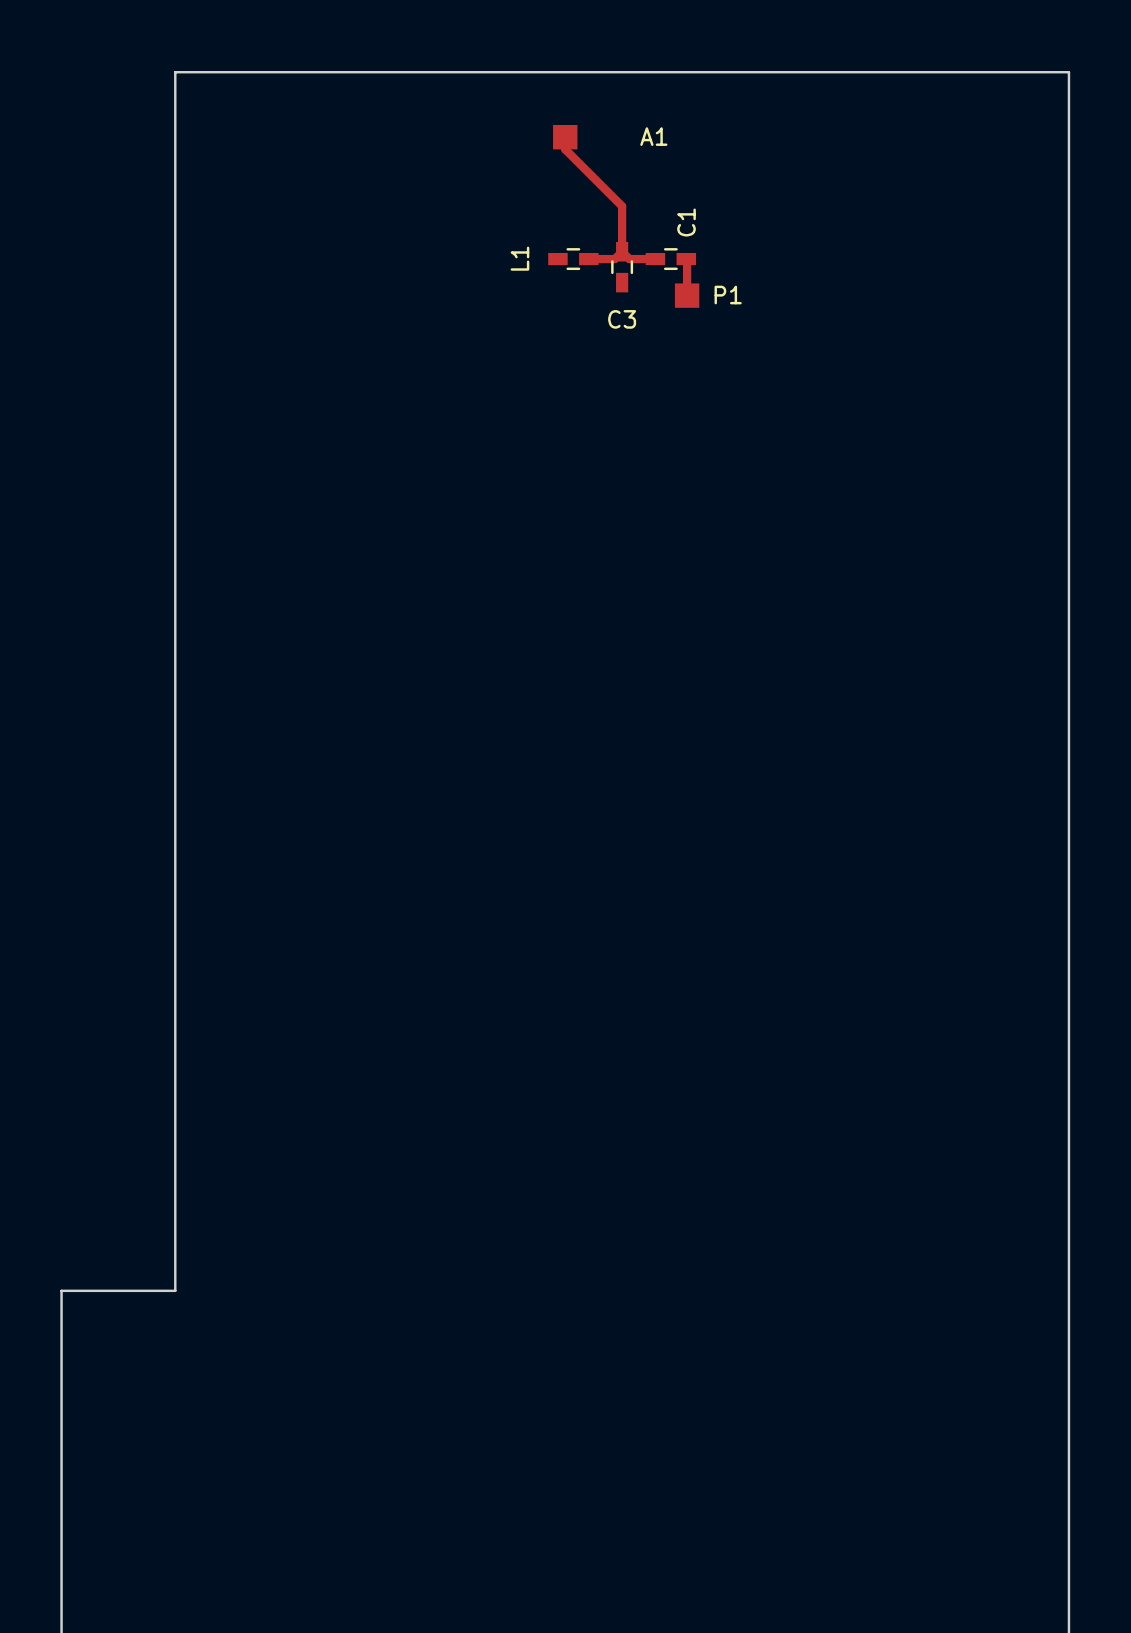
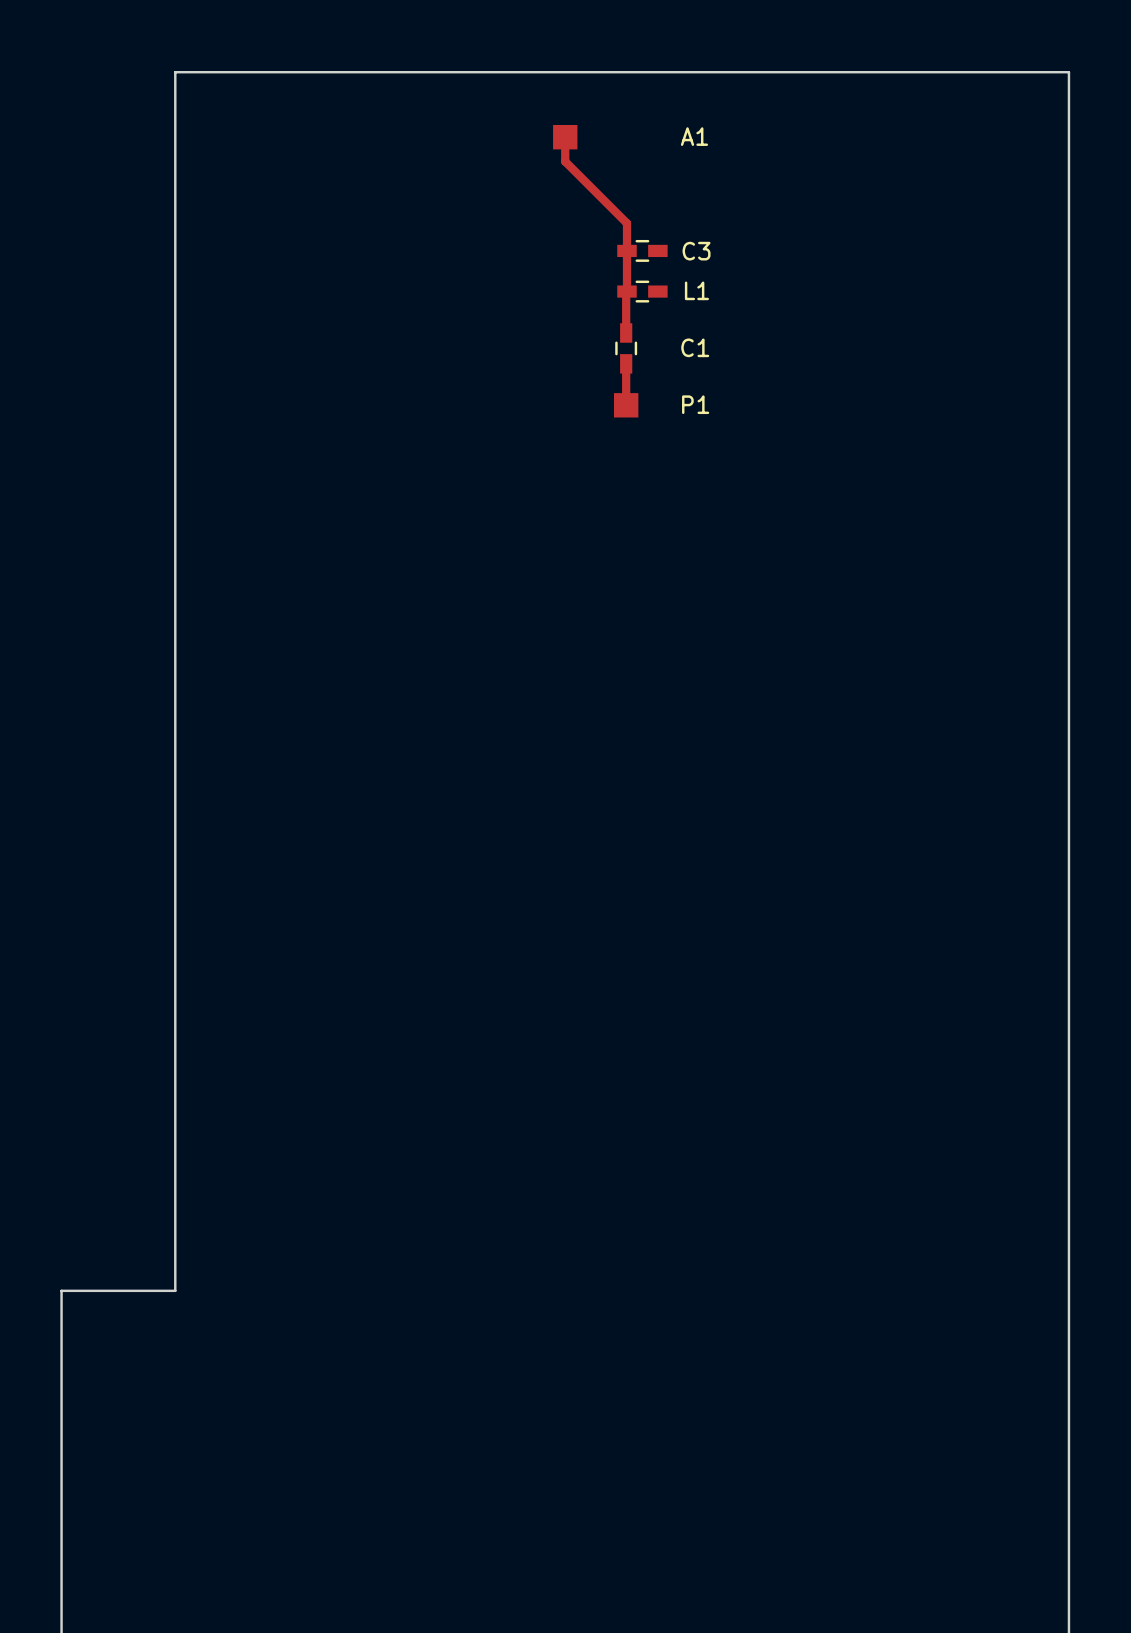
A1 name position: A1 (653, 136) -> A1 (694, 136)
track: (565, 149) (622, 206) (622, 251) -> (565, 149) (565, 161) (626, 223) (626, 332)
C1 name position: C1 (686, 222) -> C1 (695, 347)
track: (622, 251) (614, 259) (588, 259) -> none
track: (622, 251) (629, 259) (655, 259) -> none
L1 name rotation: 0° (519, 258) -> 90° clockwise (696, 290)
L1 name position: L1 (519, 258) -> L1 (696, 290)
L1 position: (573, 259) -> (642, 291)
C1 rotation: 0° (670, 259) -> 90° clockwise (626, 348)
C1 position: (670, 259) -> (626, 348)
track: (686, 259) (687, 295) -> none
C3 rotation: 0° (622, 267) -> 90° clockwise (642, 250)
P1 position: (687, 295) -> (626, 405)
P1 name position: P1 (728, 295) -> P1 (695, 404)
C3 name position: C3 (622, 319) -> C3 (696, 251)
track: none -> (626, 363) (626, 405)

